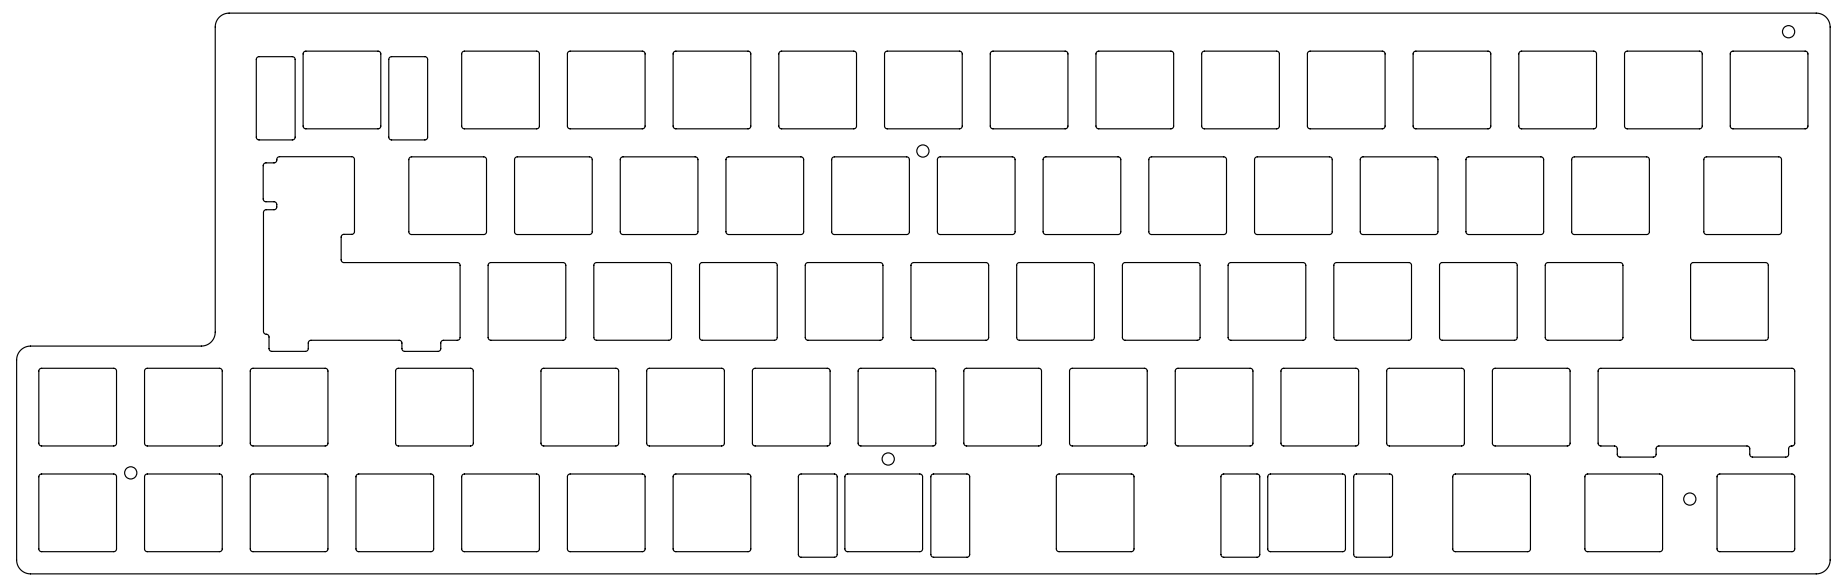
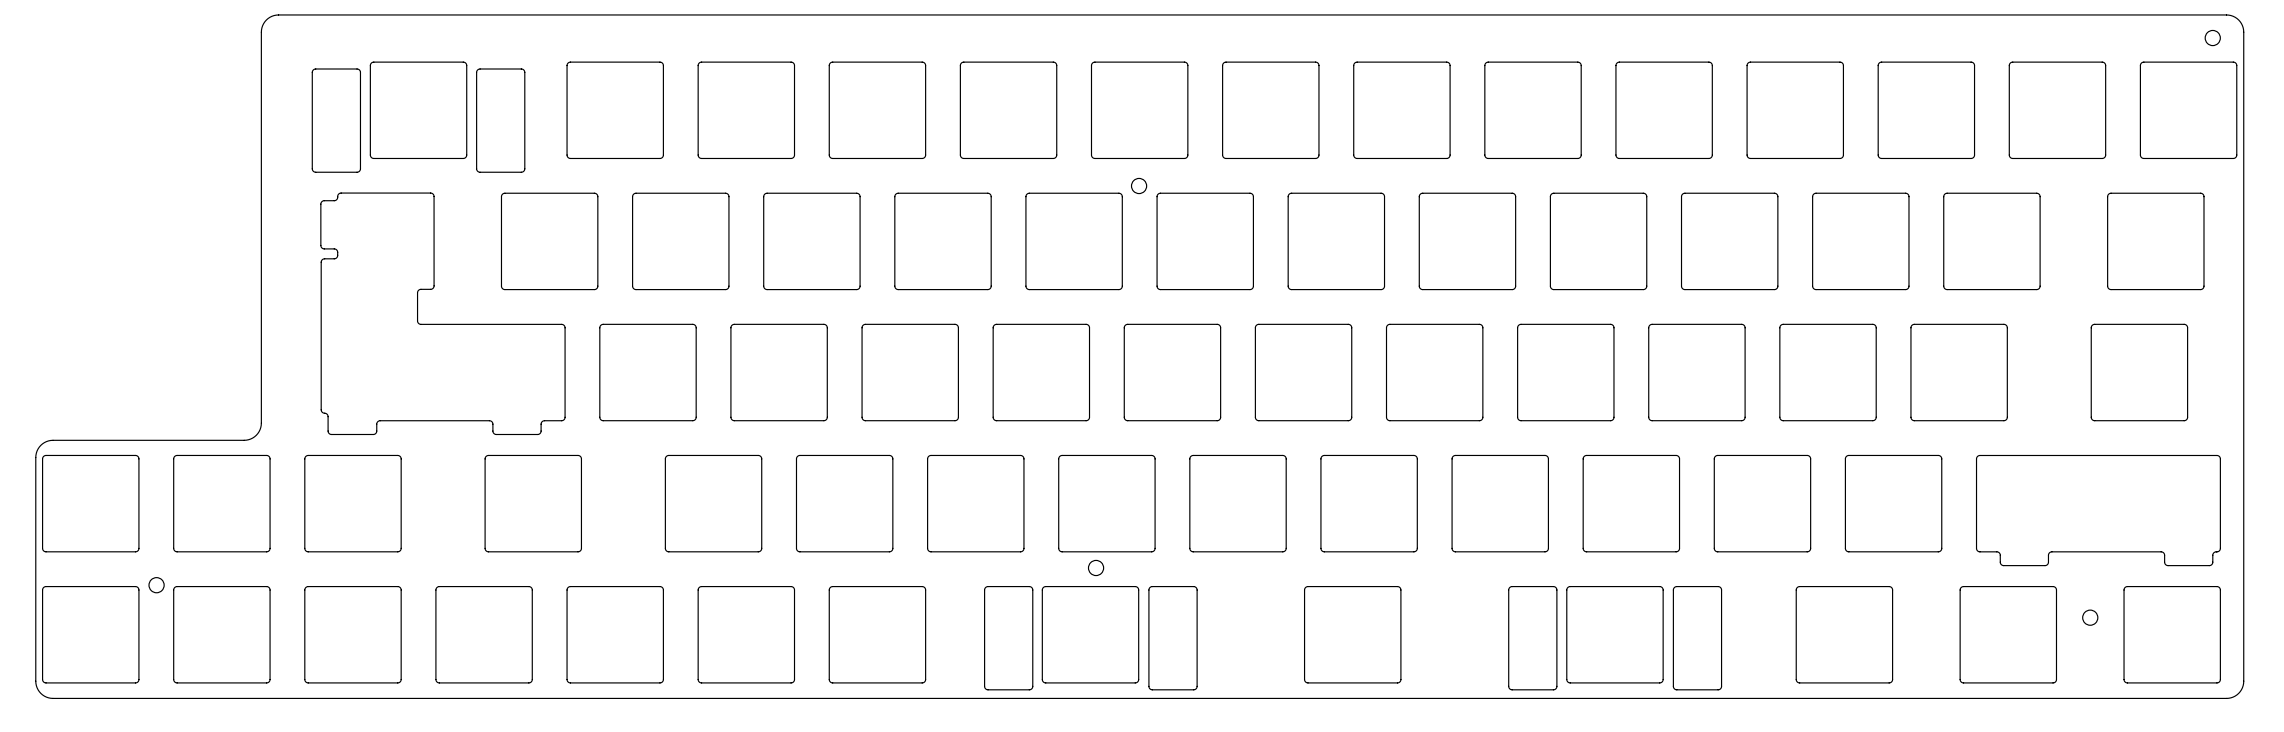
board edge: (1799, 13) (1821, 14) (1827, 18) (1830, 26) (1830, 560) (1827, 568) (1819, 573) (30, 573) (22, 571) (16, 560) (16, 359) (19, 351) (30, 346) (203, 345) (212, 340) (215, 332) -> (2226, 14) (2238, 20) (2243, 32) (2243, 681) (2240, 691) (2230, 697) (52, 698) (42, 694) (37, 687) (35, 681) (35, 457) (39, 447) (44, 442) (52, 440) (246, 440) (252, 438) (259, 431) (261, 410)

